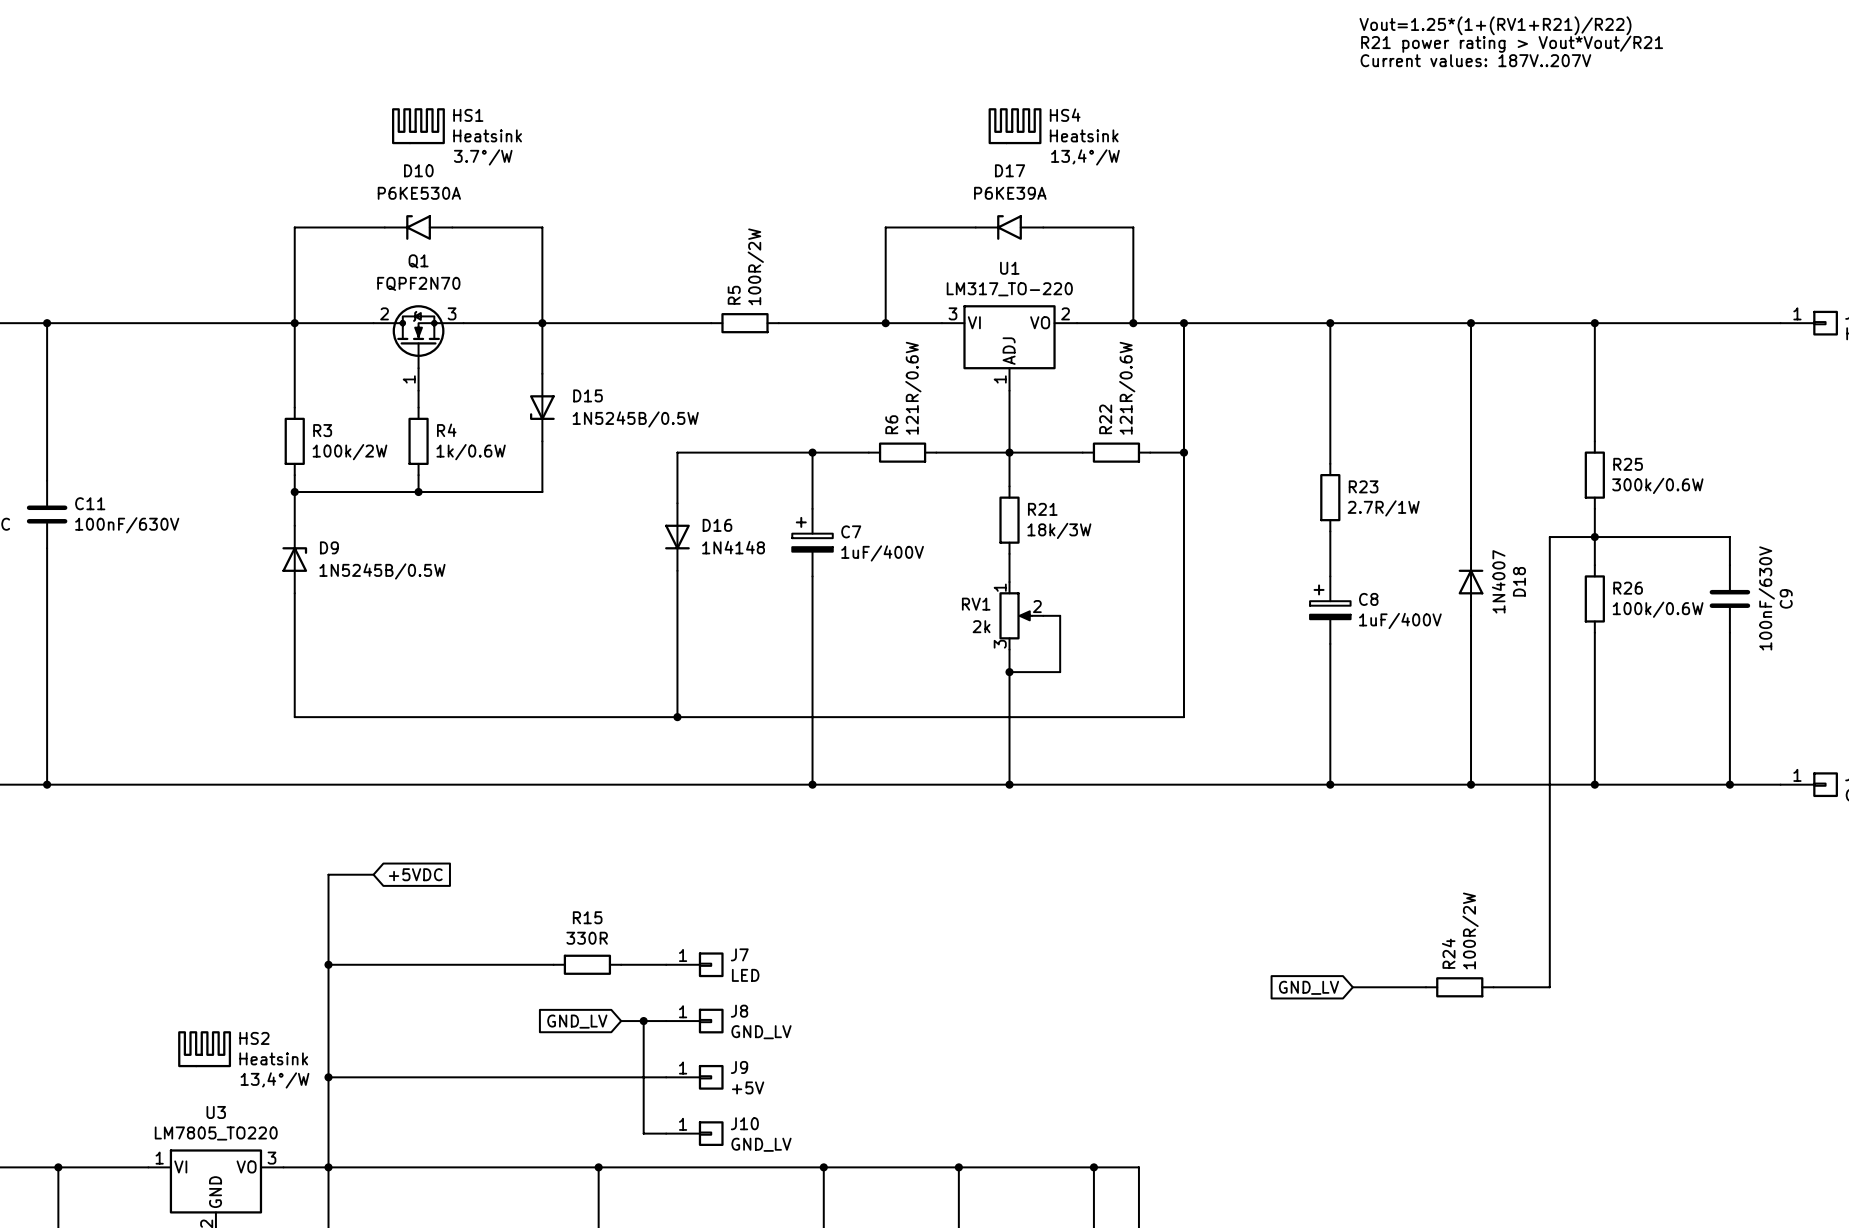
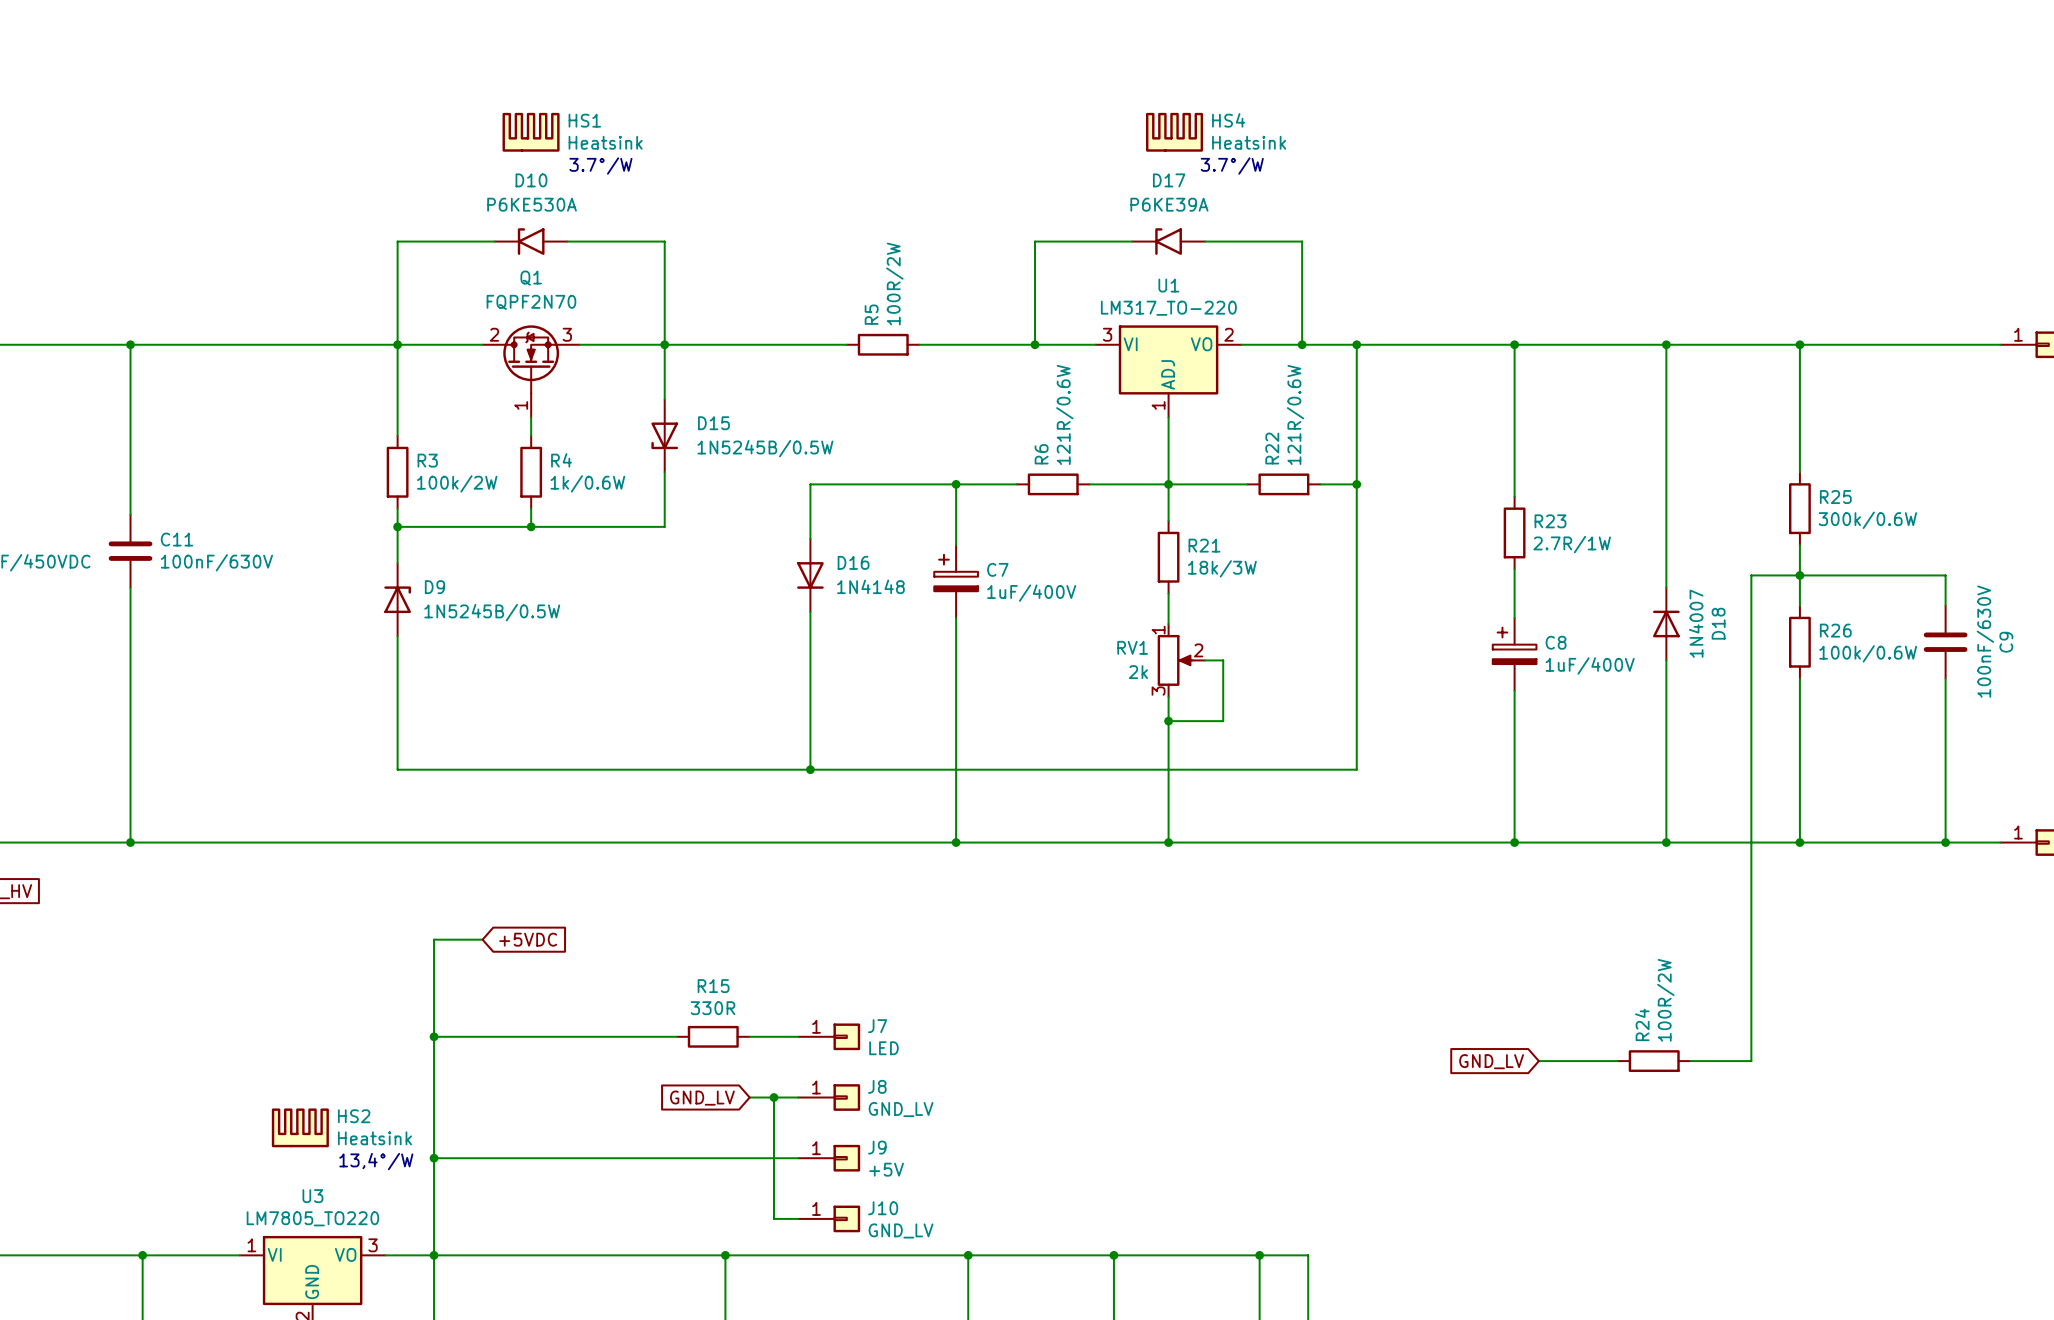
text: Vout=1.25*(1+(RV1+R21)/R22) (1495, 25) -> none
text: R21 power rating > Vout*Vout/R21 (1512, 44) -> none
text: Current values: 187V..207V (1475, 60) -> none
text: 13,4°/W (1085, 157) -> 3.7°/W (1232, 165)

